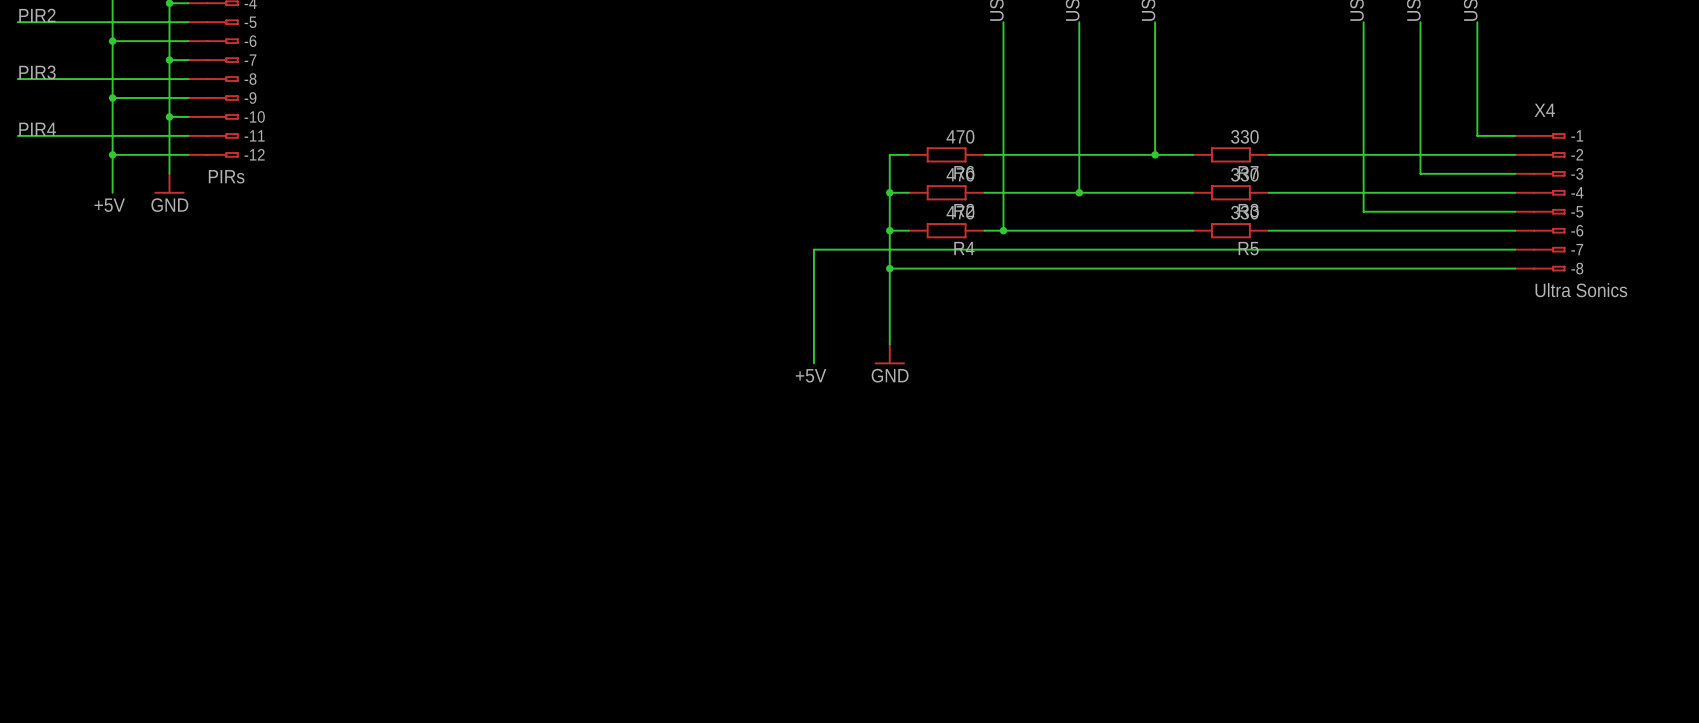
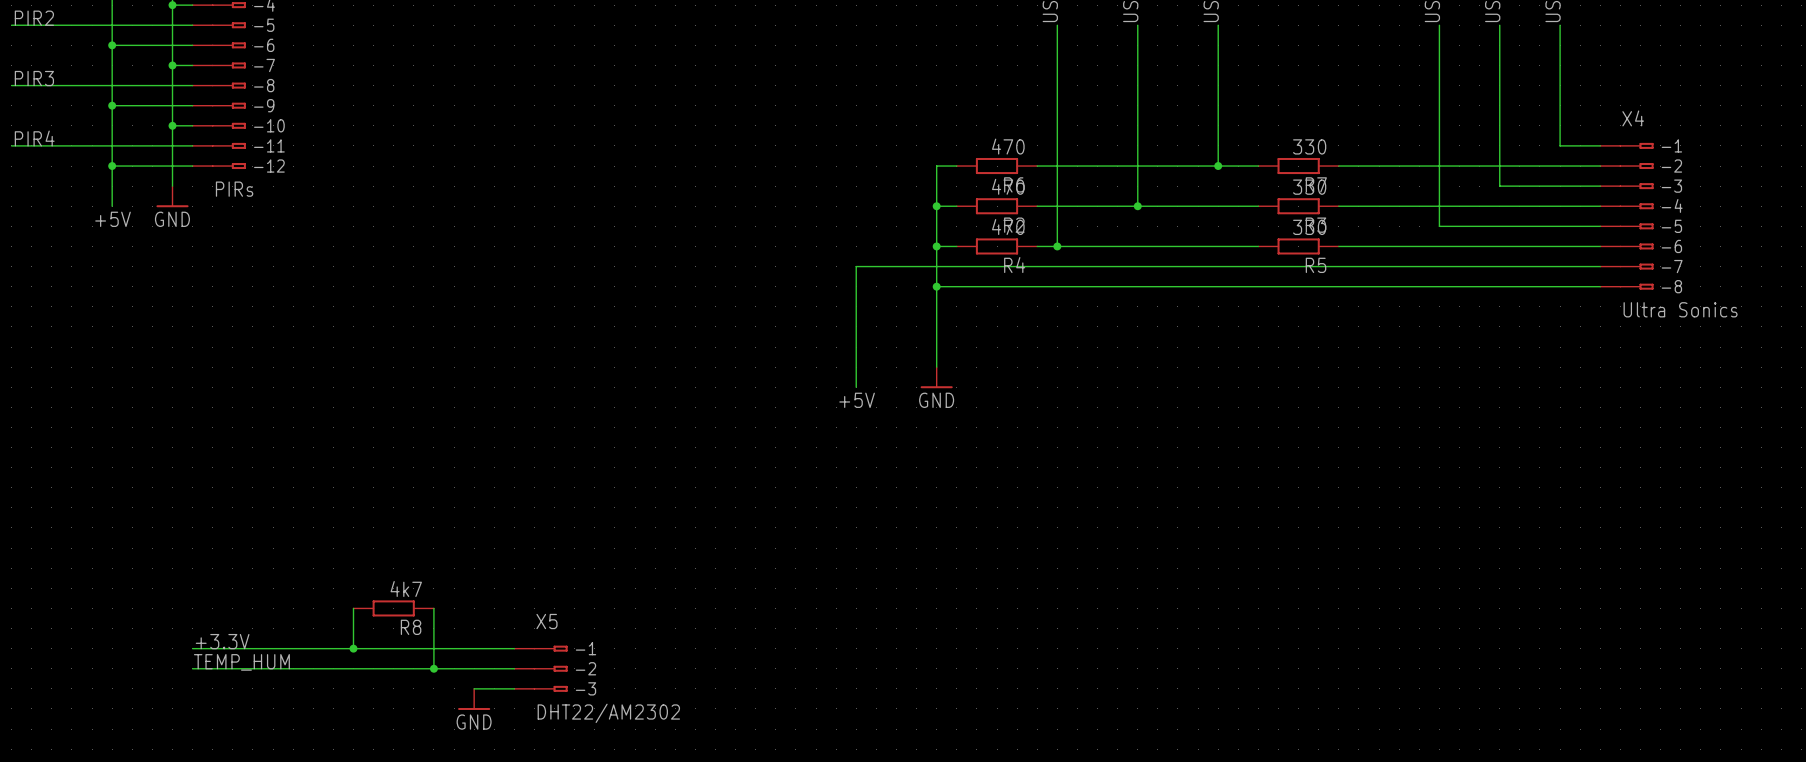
wire: none -> (353, 608) (353, 648)
R8: none -> 4k7 (393, 608)
wire: none -> (433, 608) (433, 668)
label: none -> +3.3V (222, 641)
wire: none -> (192, 648) (514, 648)
junction: none -> (353, 648)
label: none -> TEMP_HUM (241, 662)
wire: none -> (192, 668) (514, 668)
junction: none -> (433, 668)
X5: none -> DHT22/AM2302 (541, 668)
wire: none -> (474, 688) (514, 688)
power symbol: none -> GND (474, 699)

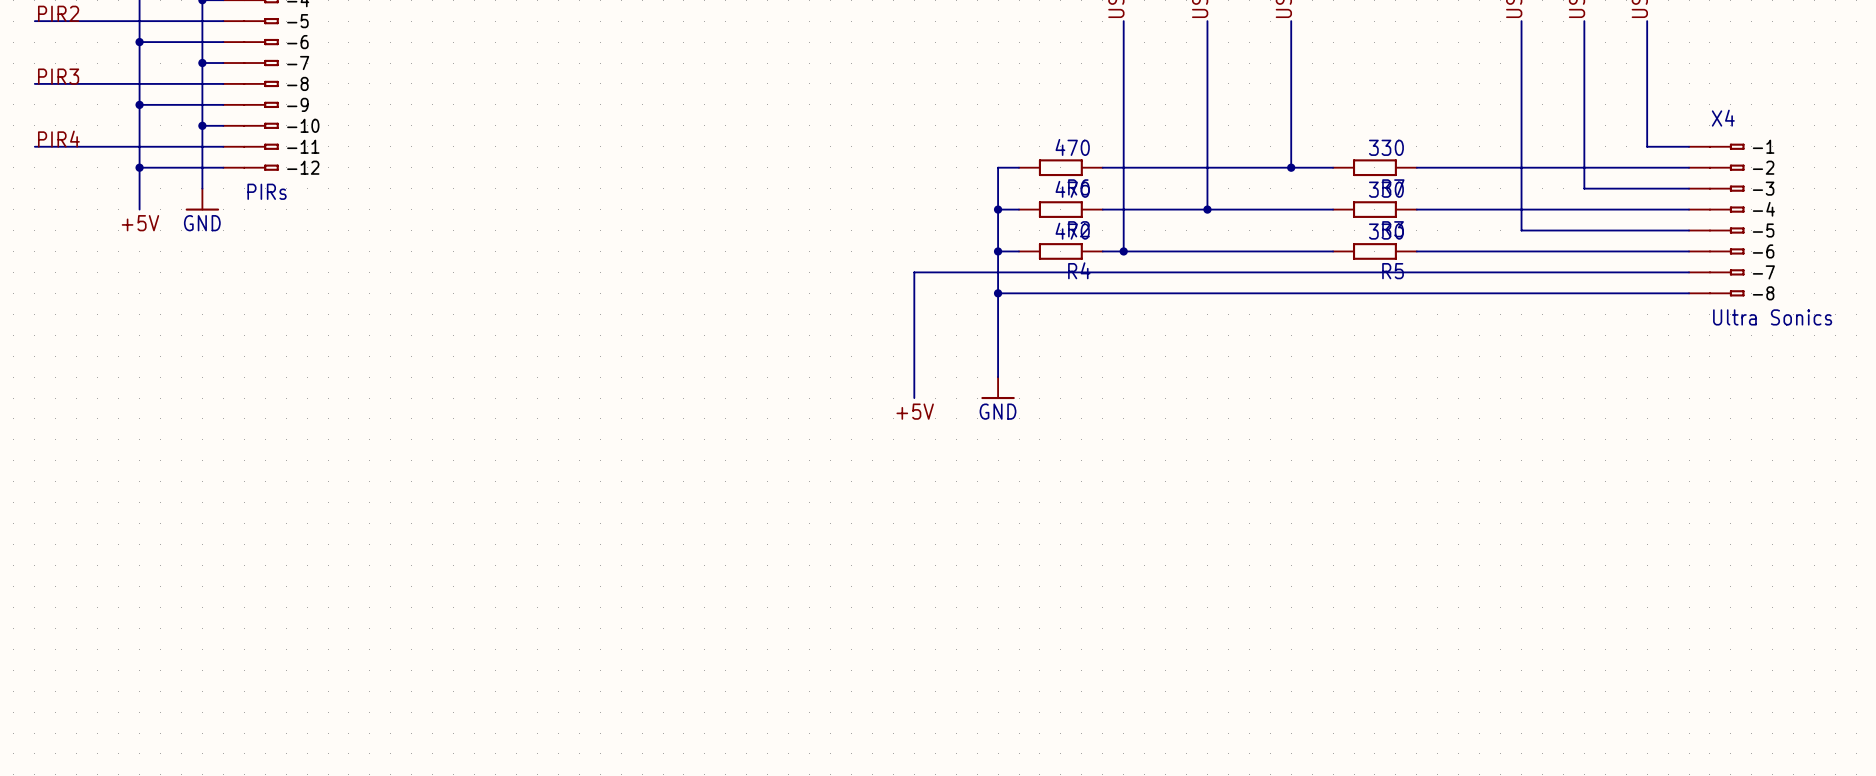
wire: (353, 608) (353, 648) -> none
R8: 4k7 (393, 608) -> none
wire: (433, 608) (433, 668) -> none
label: +3.3V (222, 641) -> none
wire: (192, 648) (514, 648) -> none
junction: (353, 648) -> none
label: TEMP_HUM (241, 662) -> none
wire: (192, 668) (514, 668) -> none
junction: (433, 668) -> none
X5: DHT22/AM2302 (541, 668) -> none
wire: (474, 688) (514, 688) -> none
power symbol: GND (474, 699) -> none

